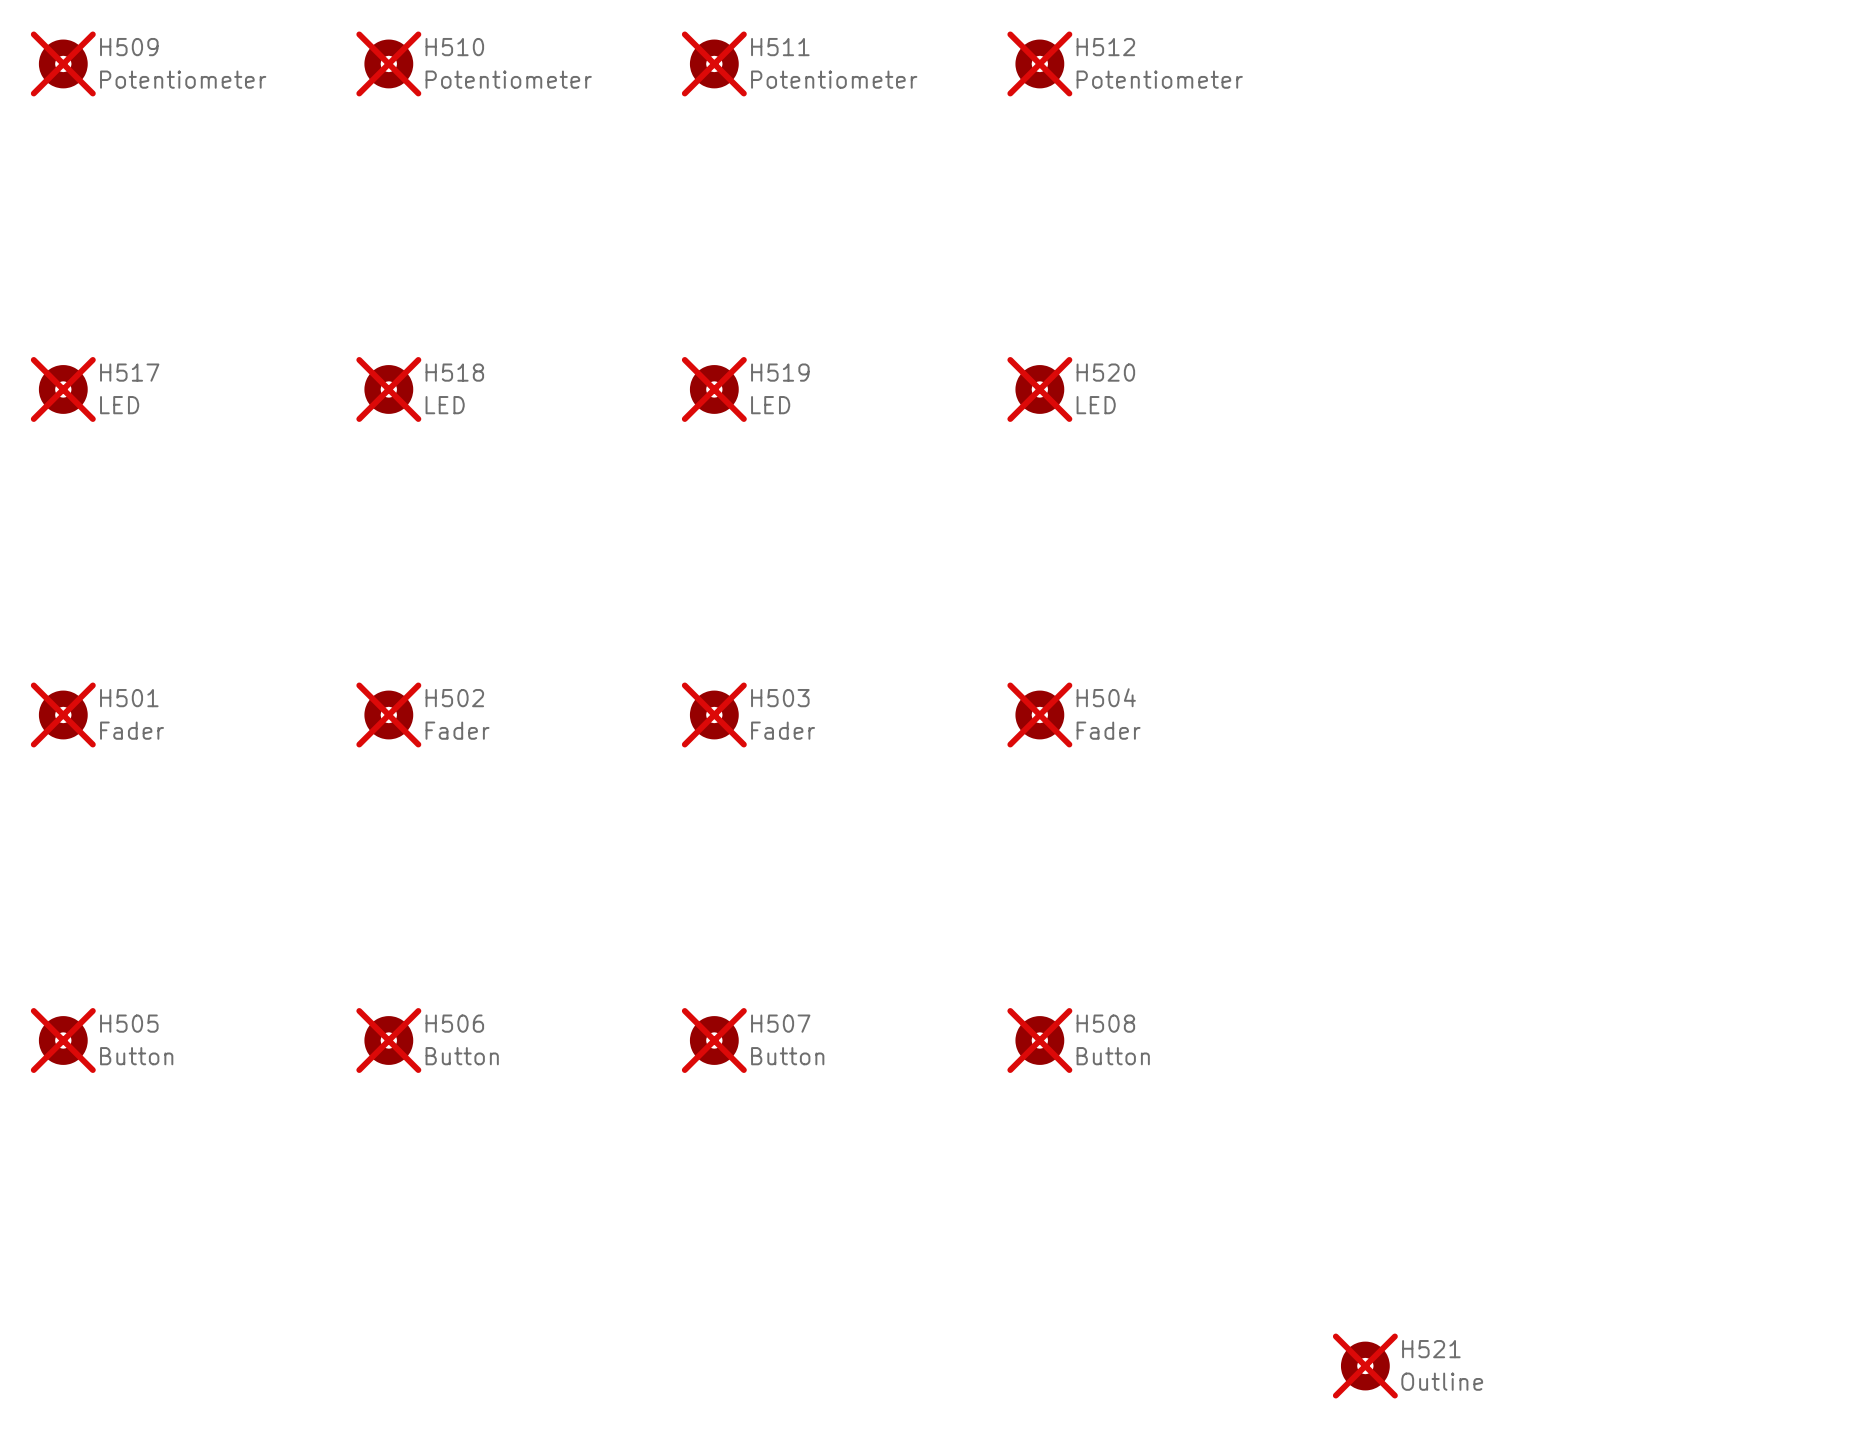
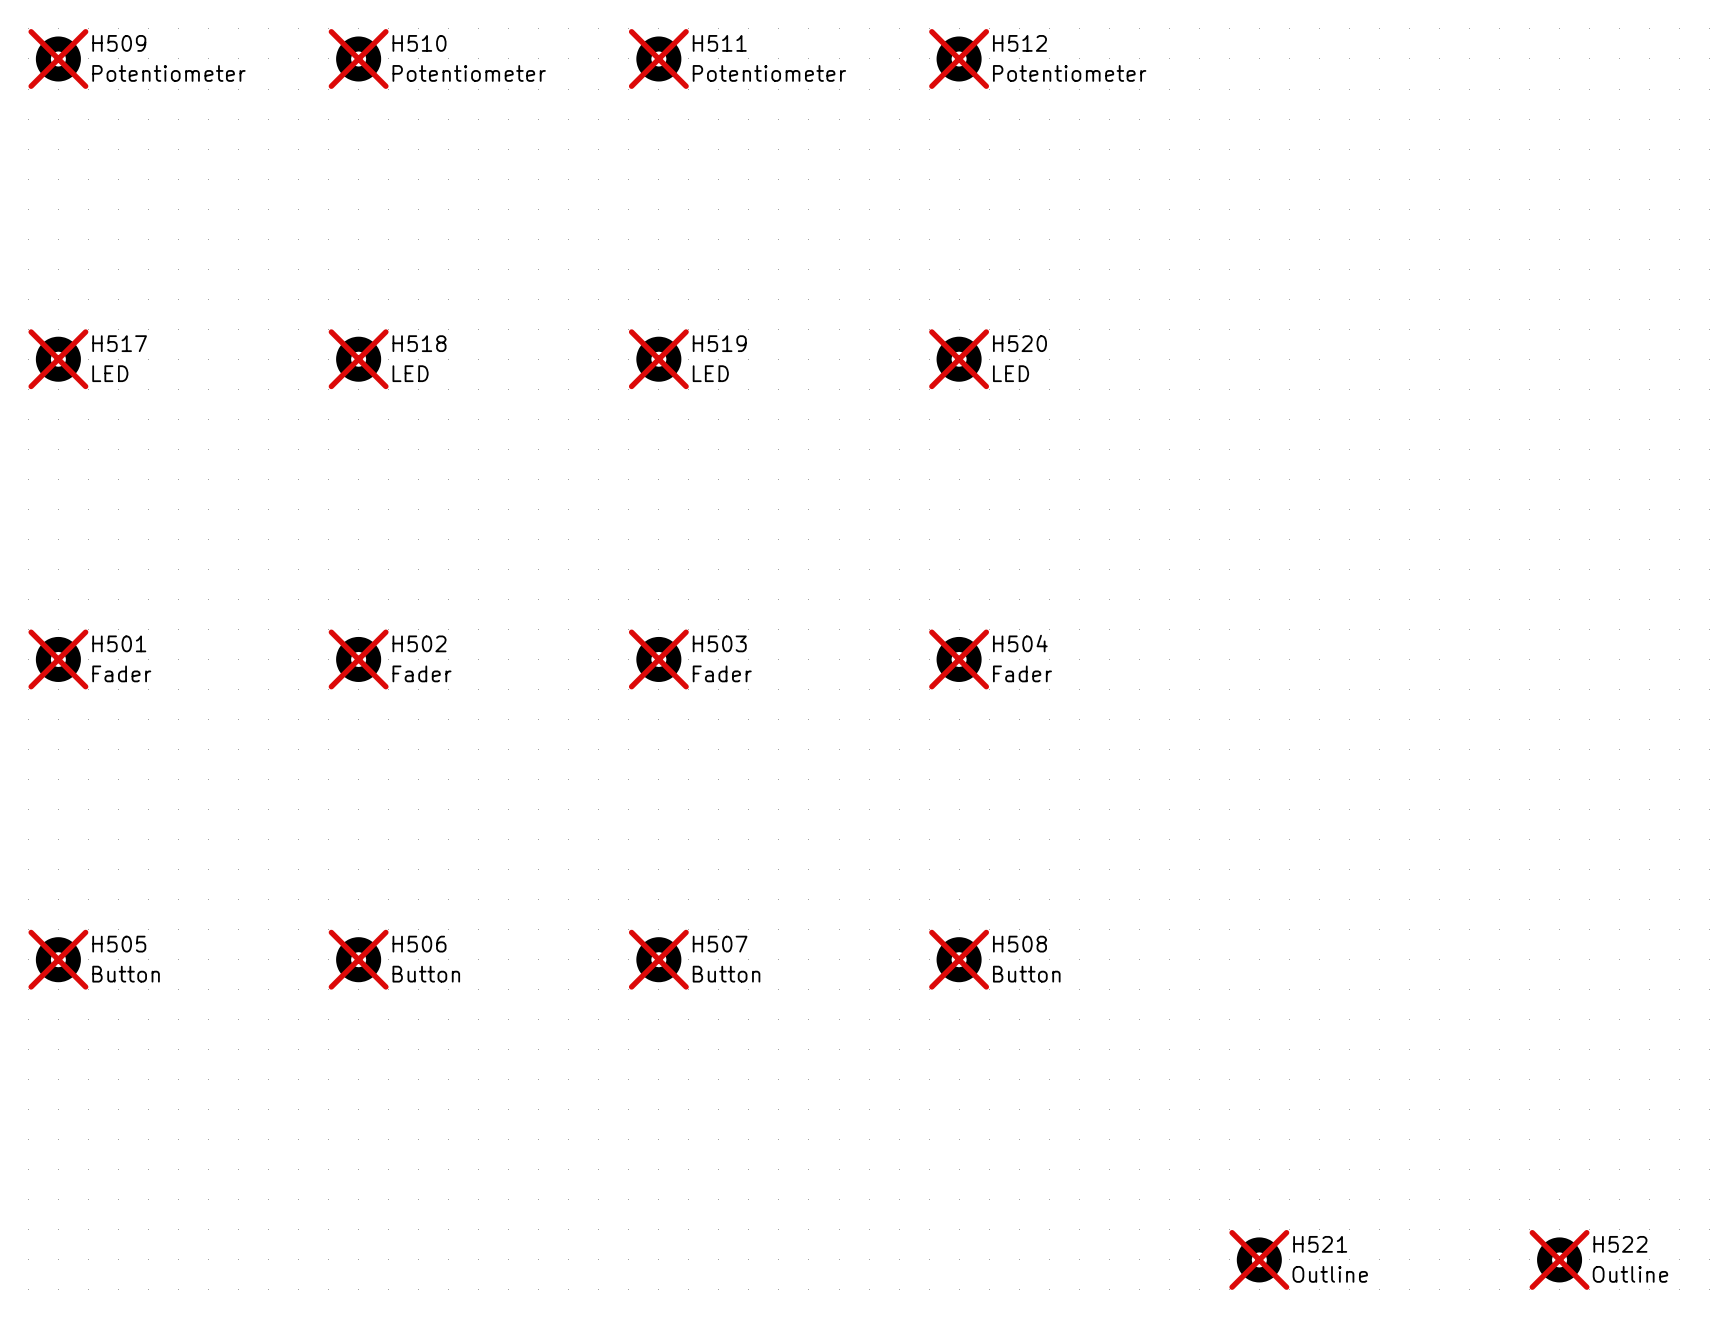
H522: none -> Outline (1559, 1259)

